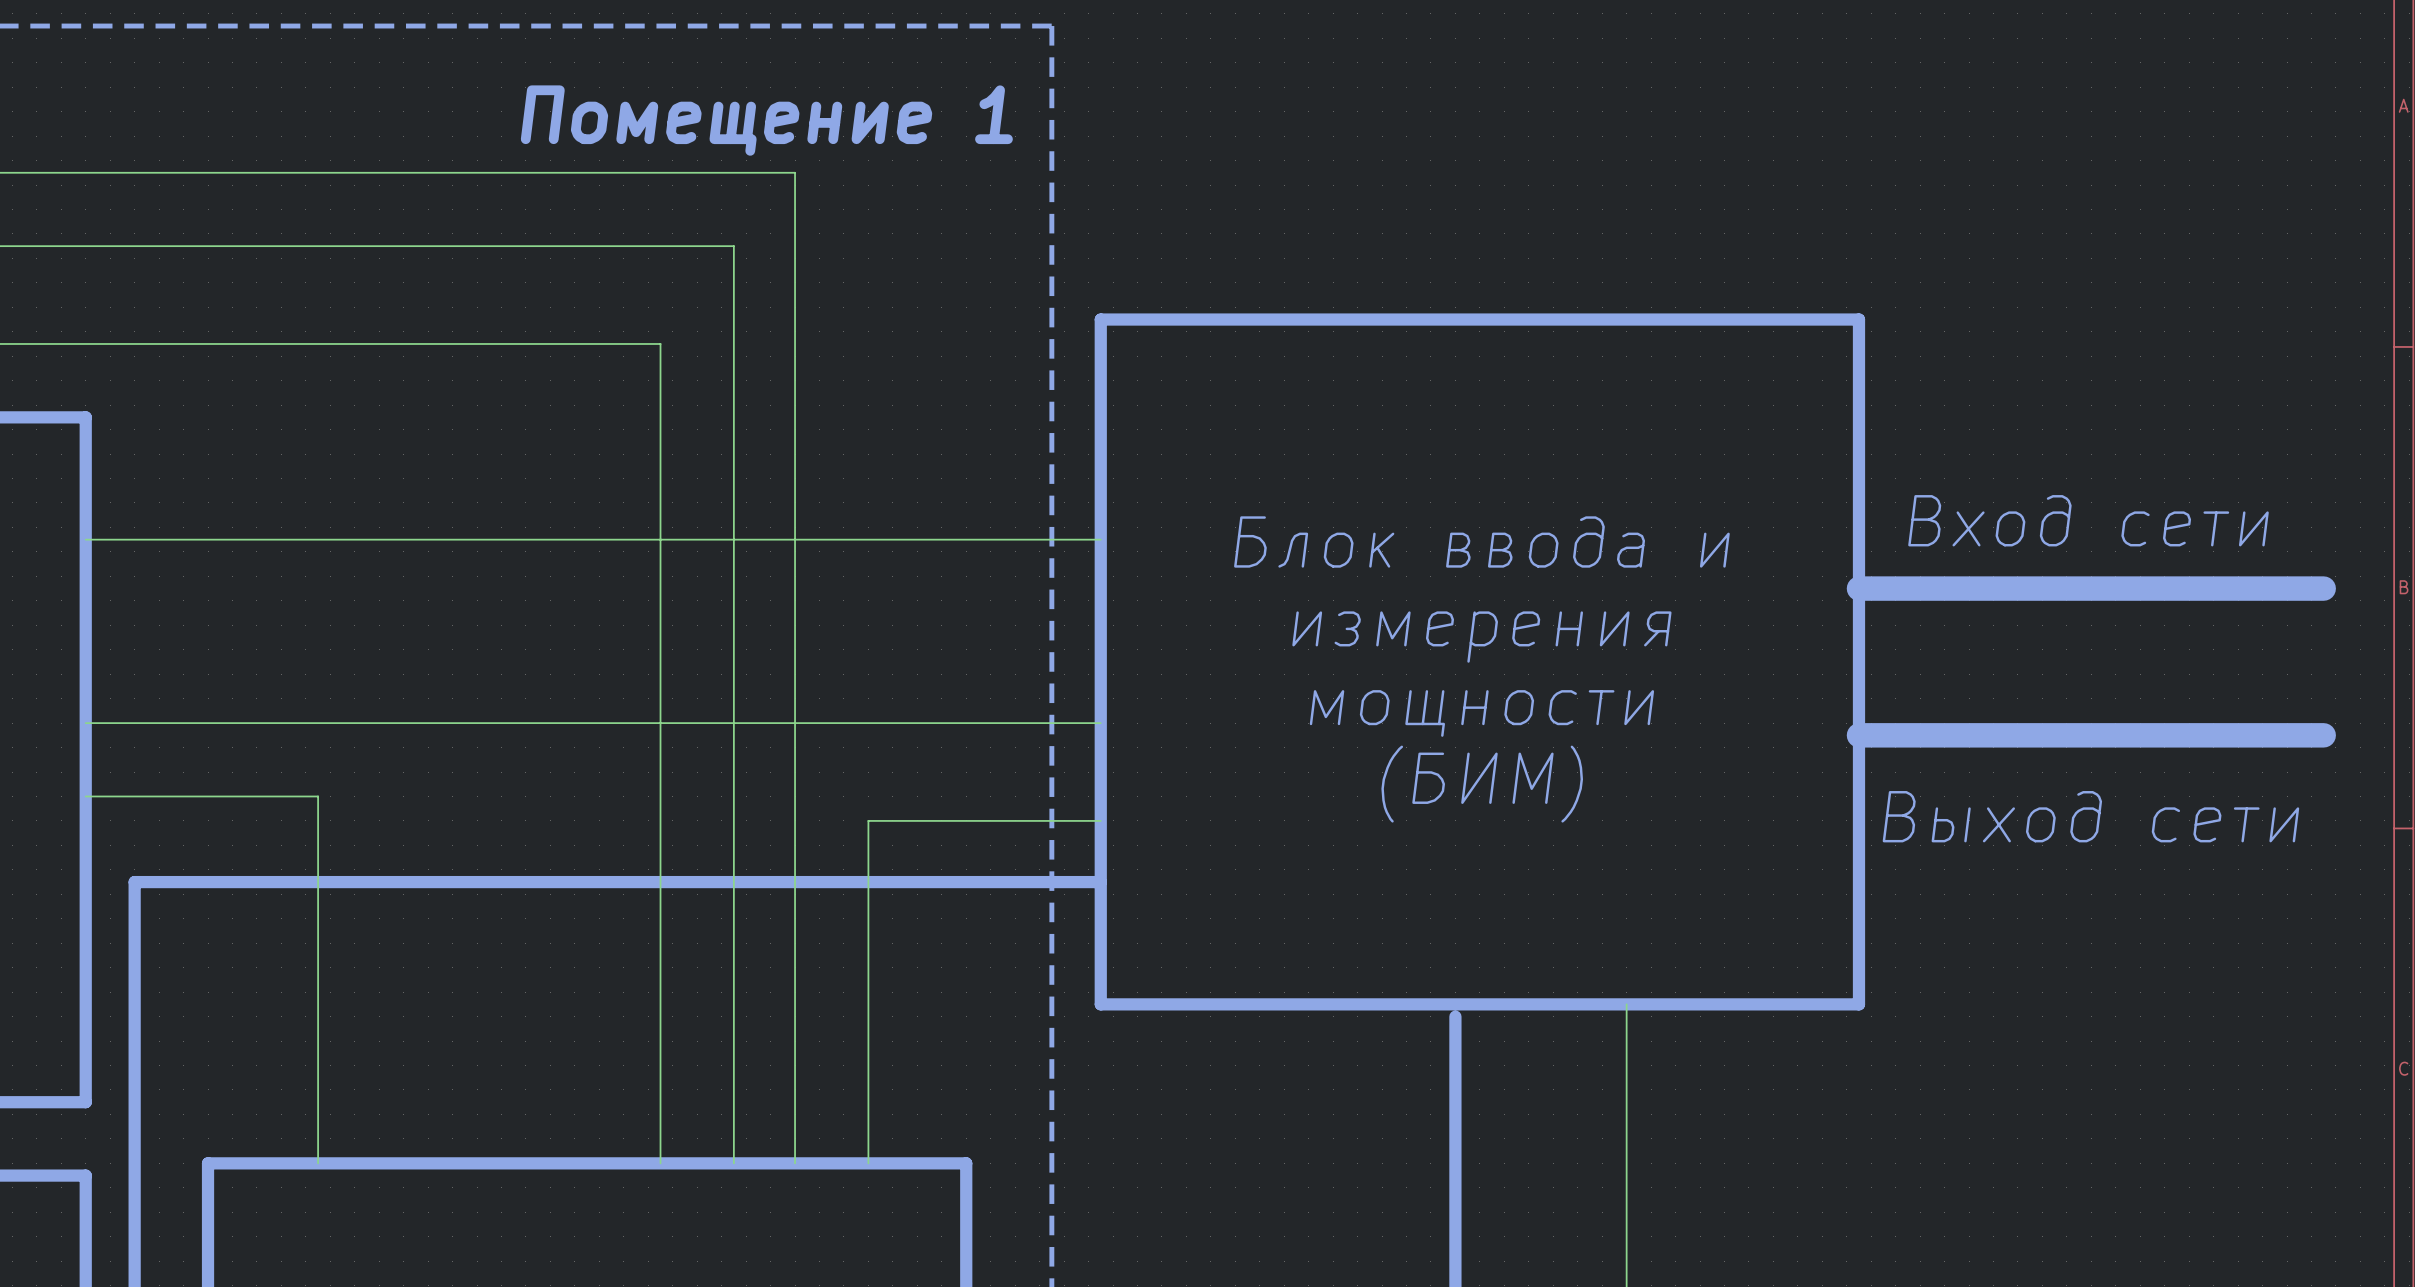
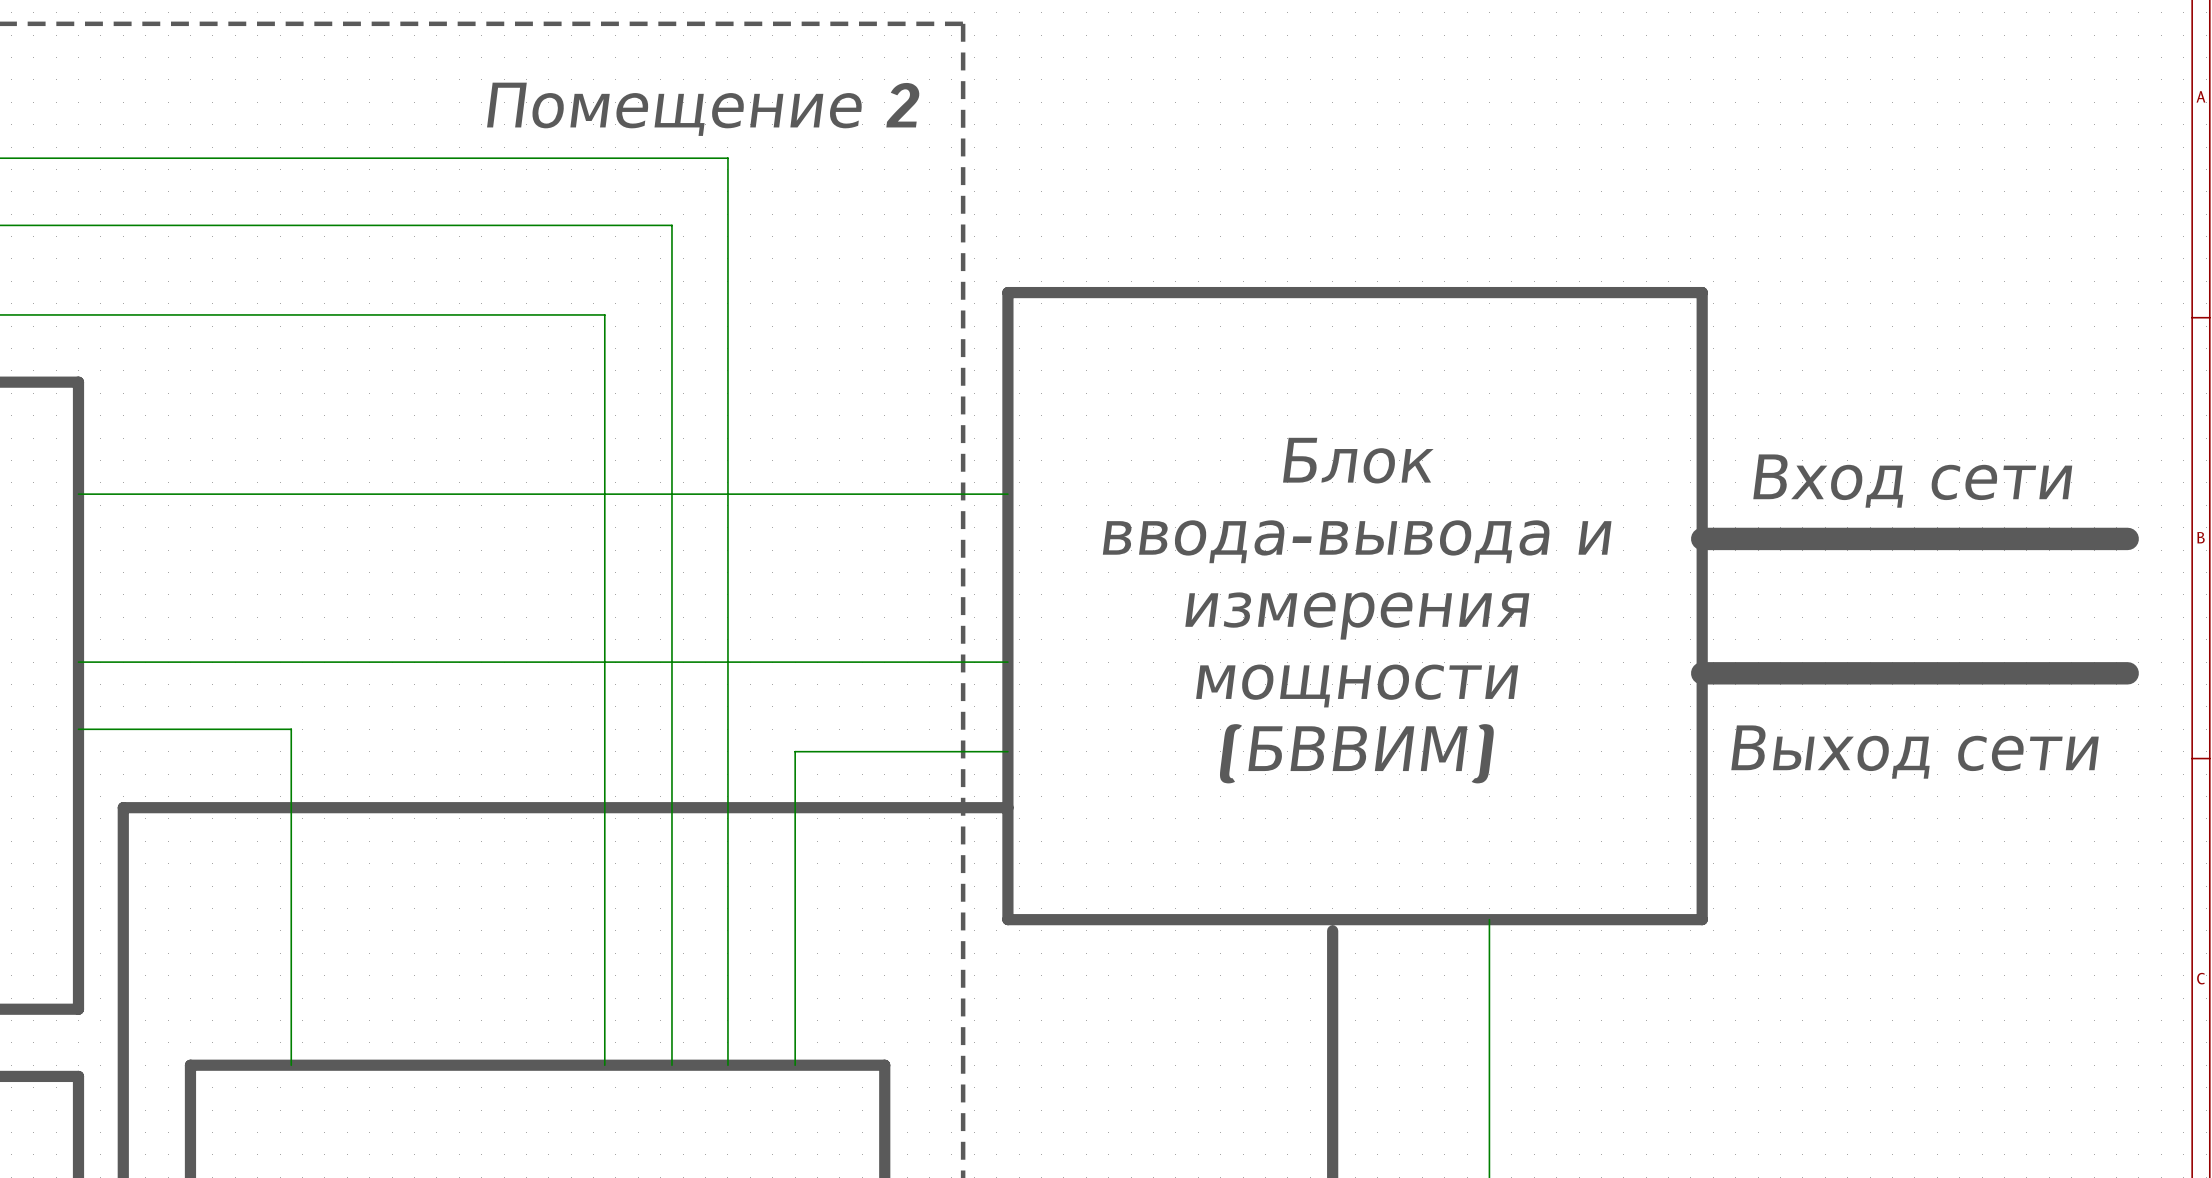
text: Помещение 1 (766, 120) -> Помещение 2 (703, 109)
text: none -> Блок (1358, 460)
text: Блок ввода и (1481, 541) -> ввода-вывода и (1357, 541)
text position: измерения (1481, 637) -> измерения (1357, 616)
text position: мощности (1481, 713) -> мощности (1357, 685)
text: (БИМ) (1482, 784) -> (БВВИМ) (1356, 753)

